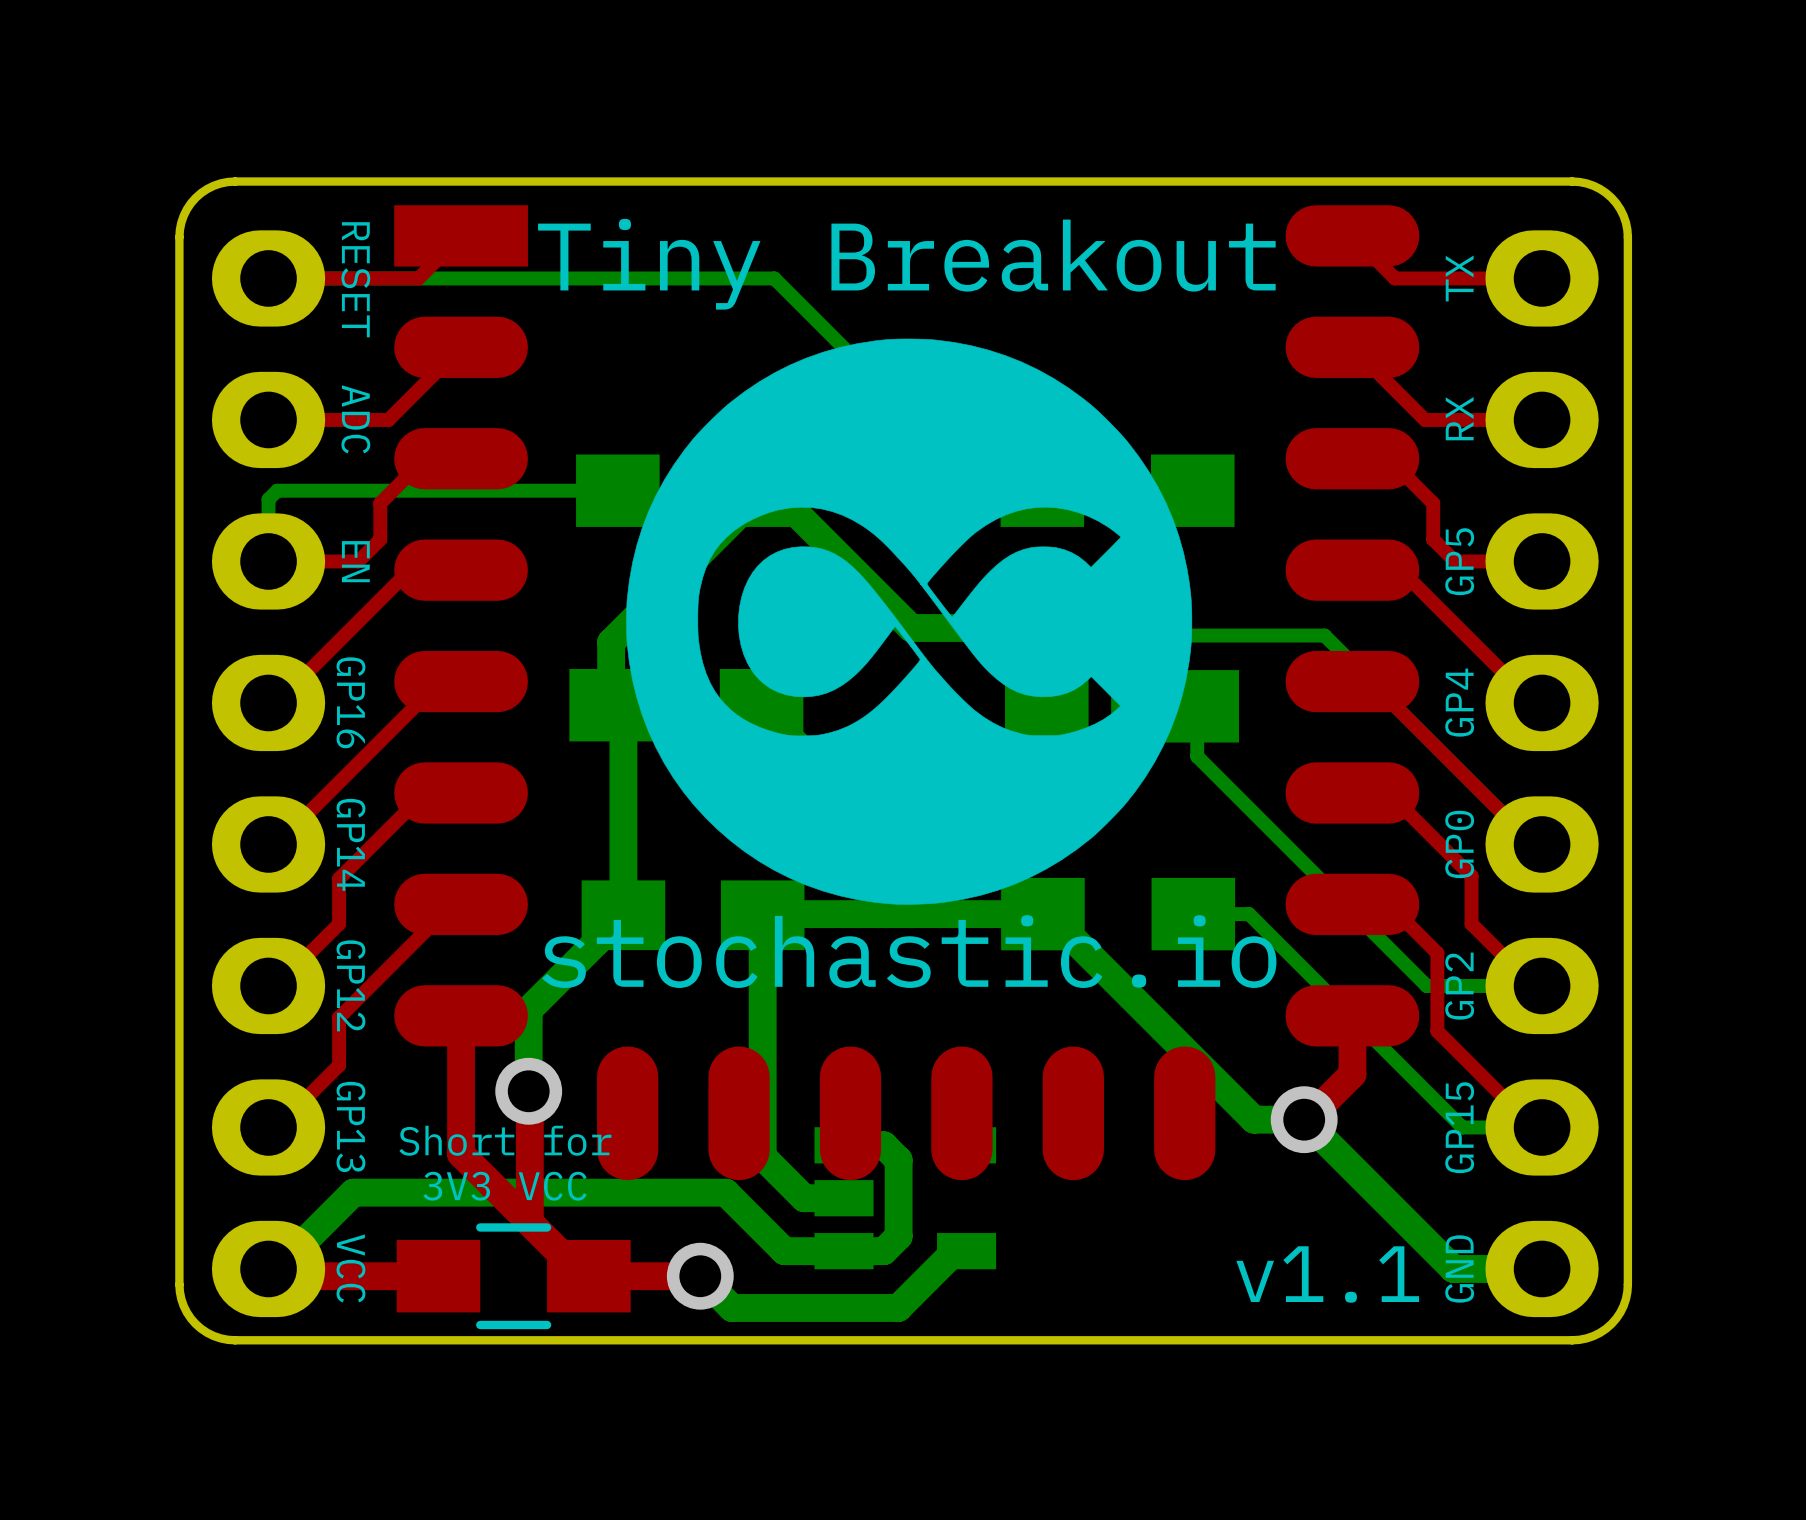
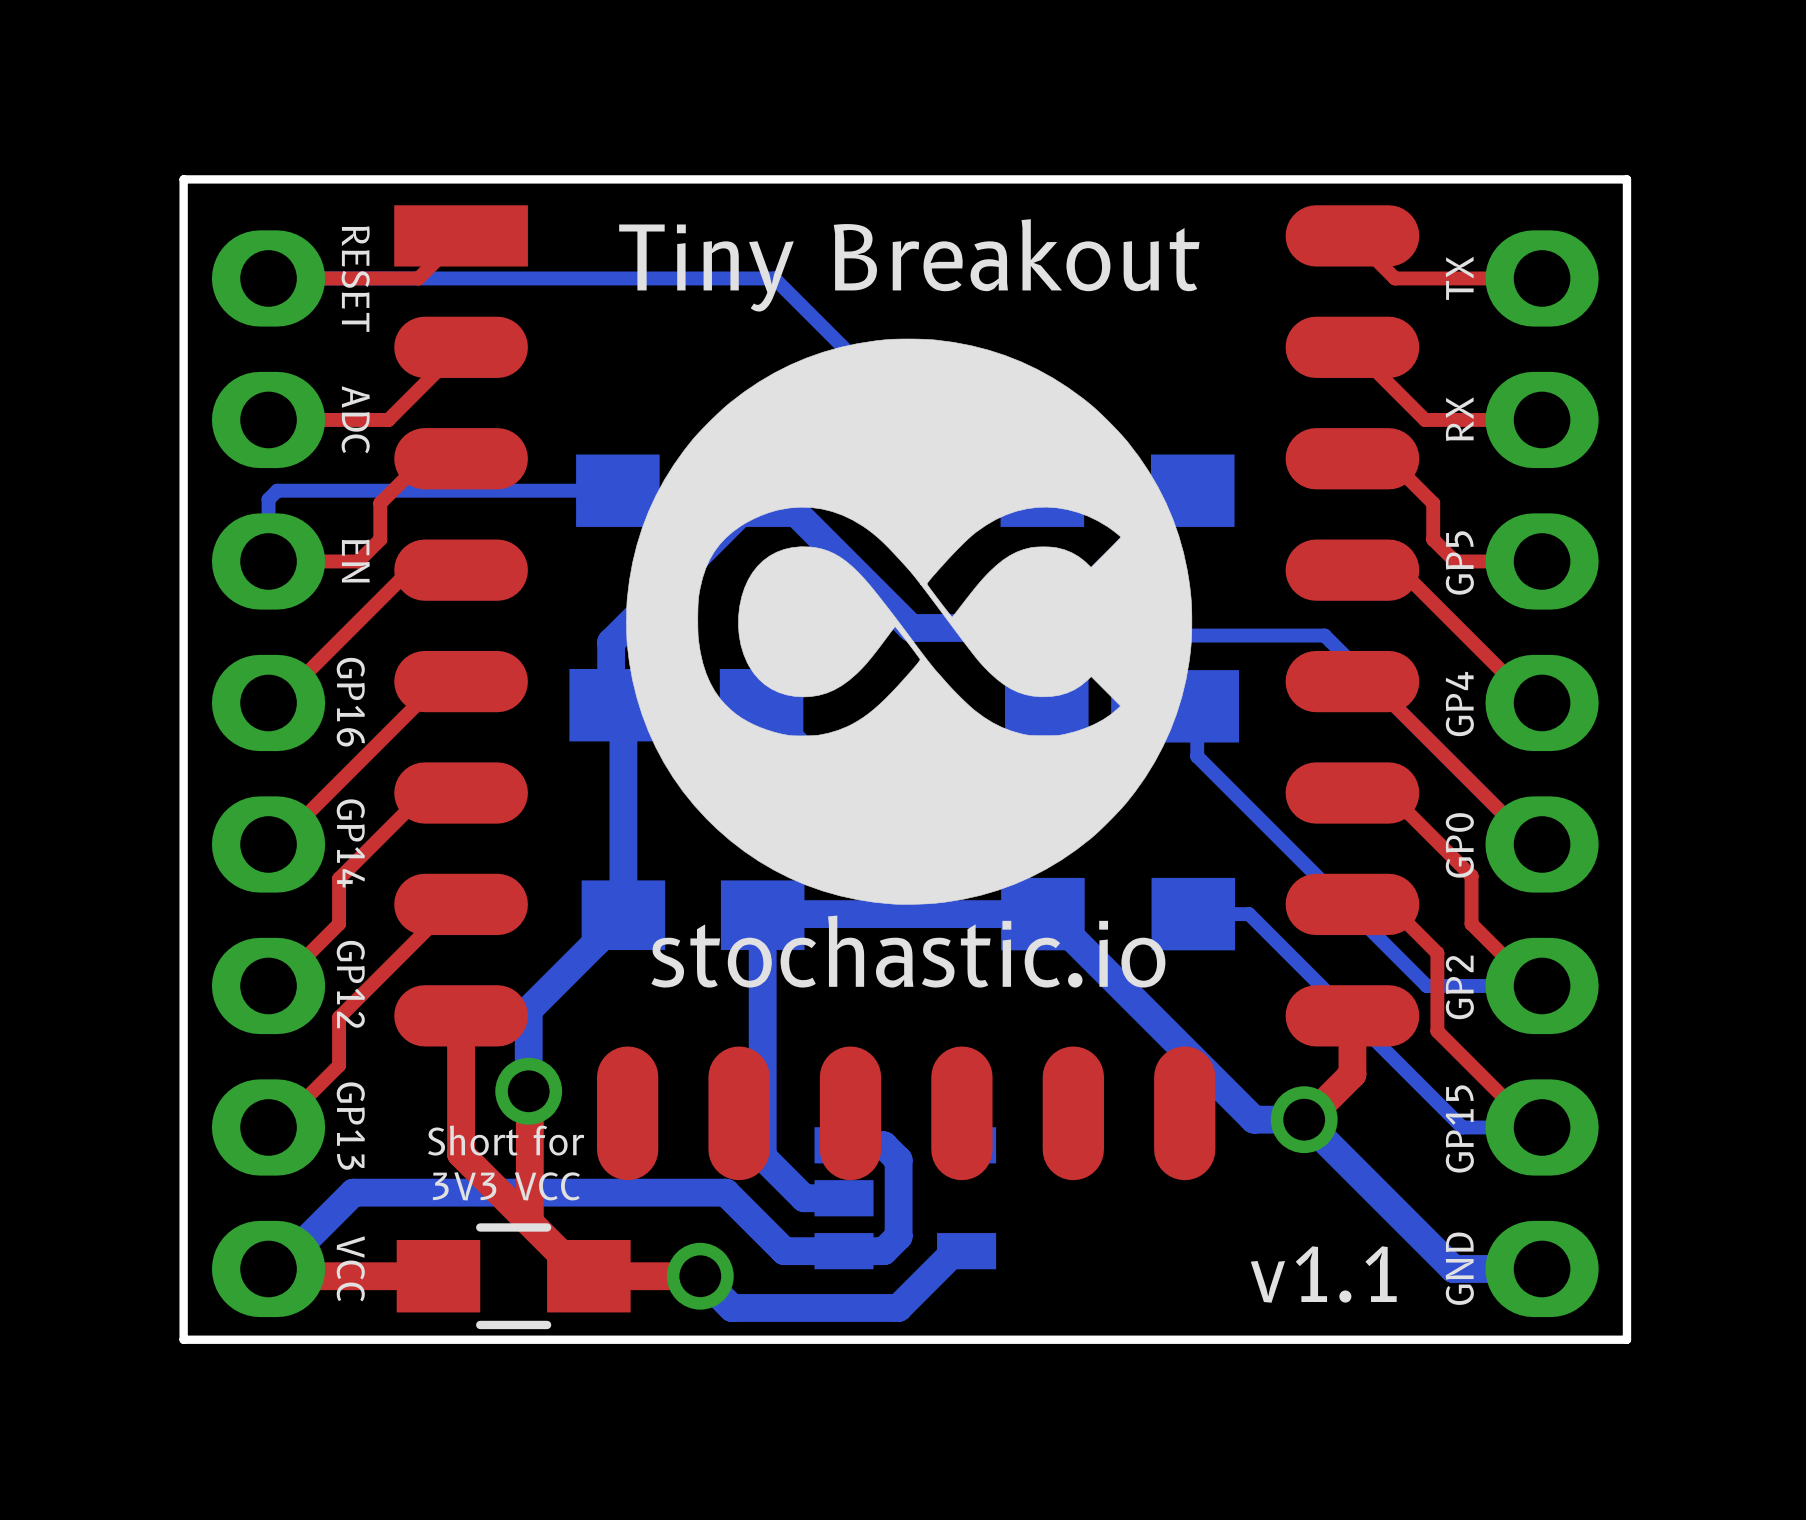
board edge: (235, 181) (1572, 181) (1593, 185) (1606, 193) (1620, 209) (1625, 222) (1627, 237) (1627, 1284) (1625, 1299) (1616, 1318) (1606, 1328) (1593, 1336) (1572, 1340) (235, 1340) (213, 1336) (201, 1328) (190, 1318) (183, 1305) (179, 1284) (179, 237) (183, 215) (195, 197) (213, 185) (235, 181) -> (183, 179) (183, 1339) (1626, 1339) (1626, 179) (183, 179)

